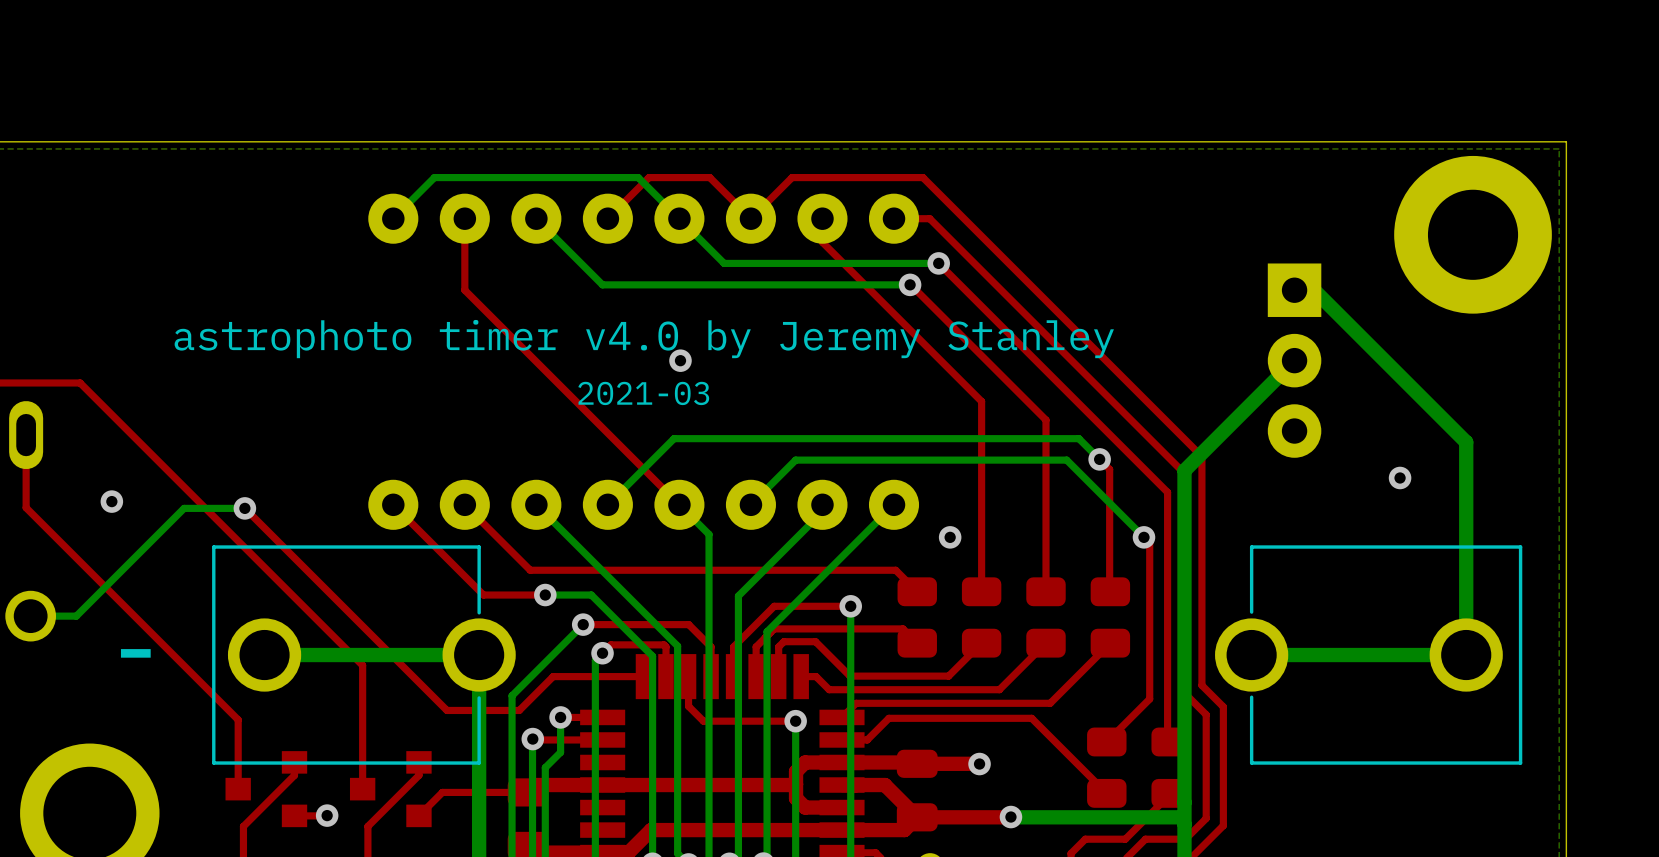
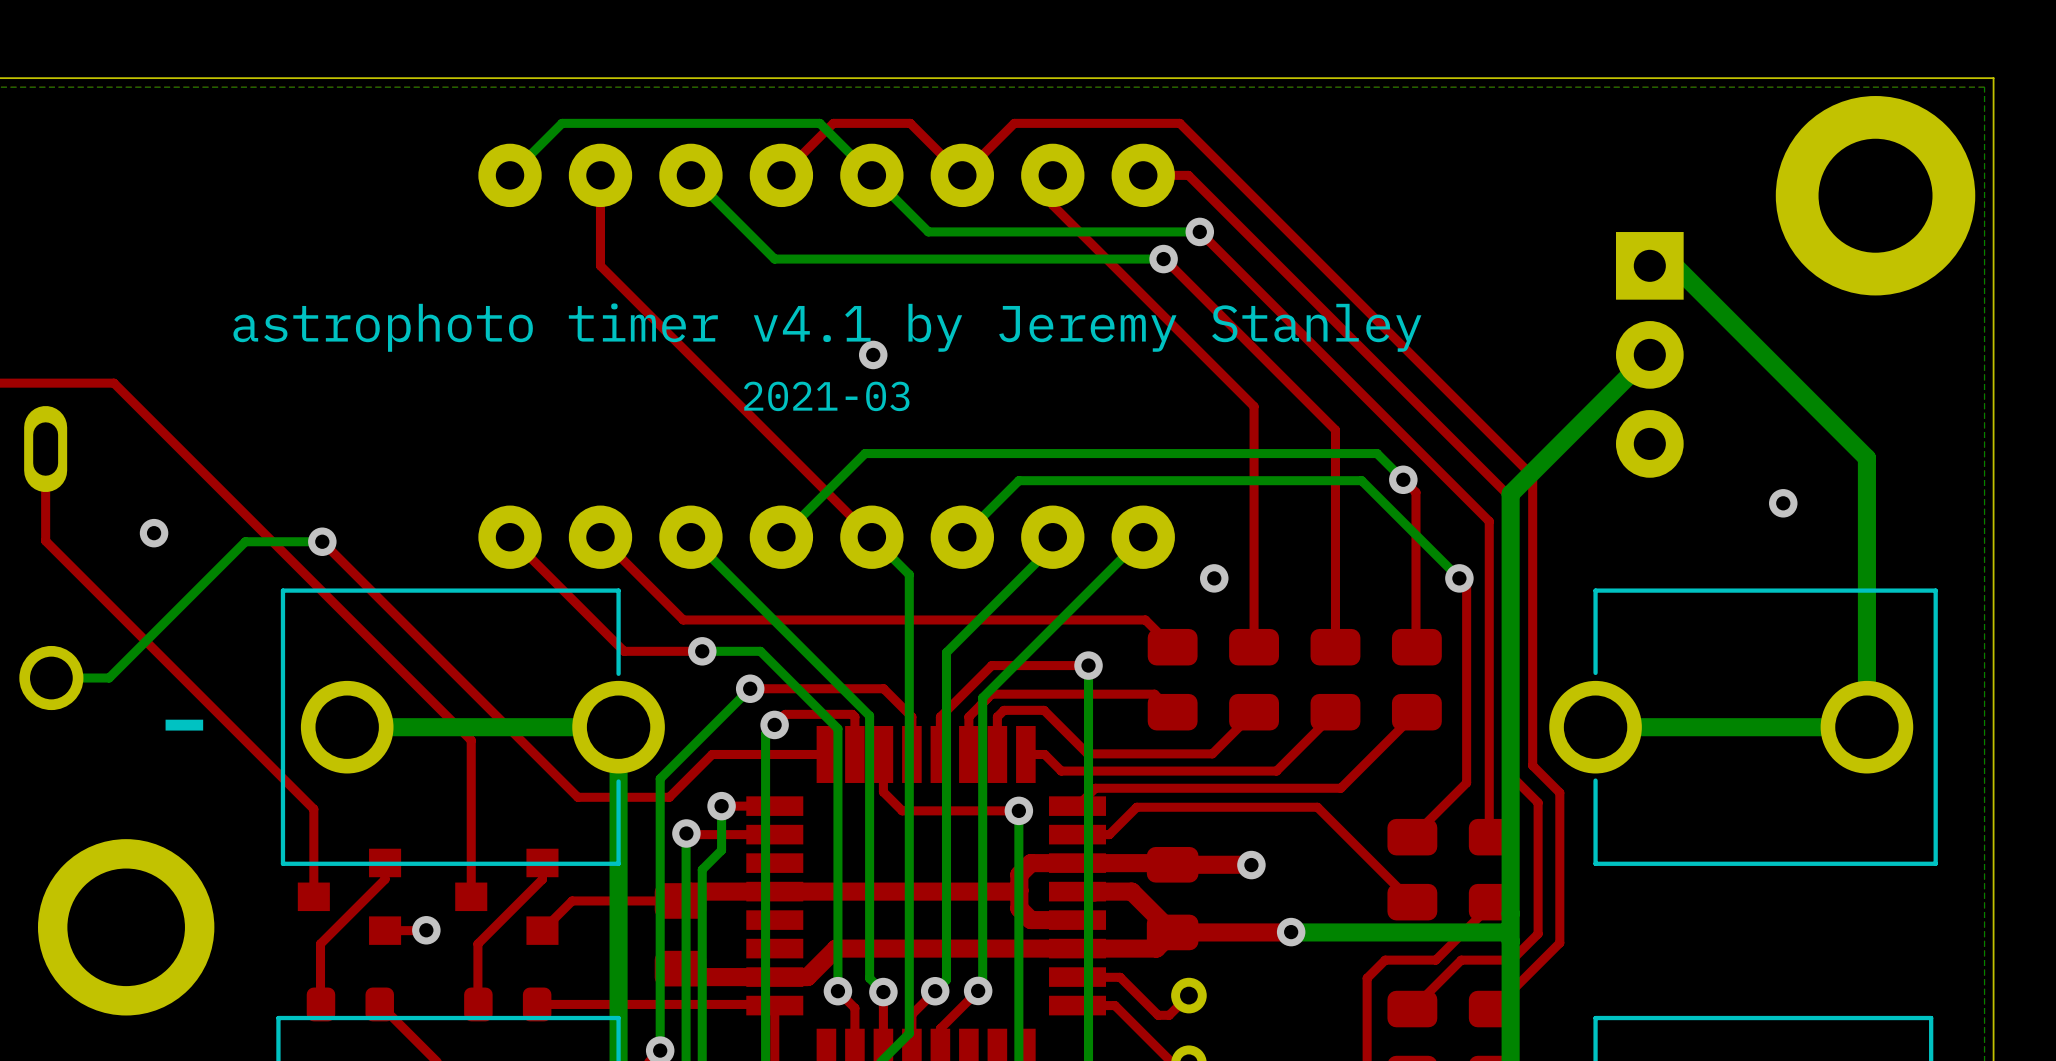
text: astrophoto timer v4.0 by Jeremy Stanley (644, 339) -> astrophoto timer v4.1 by Jeremy Stanley (827, 327)

